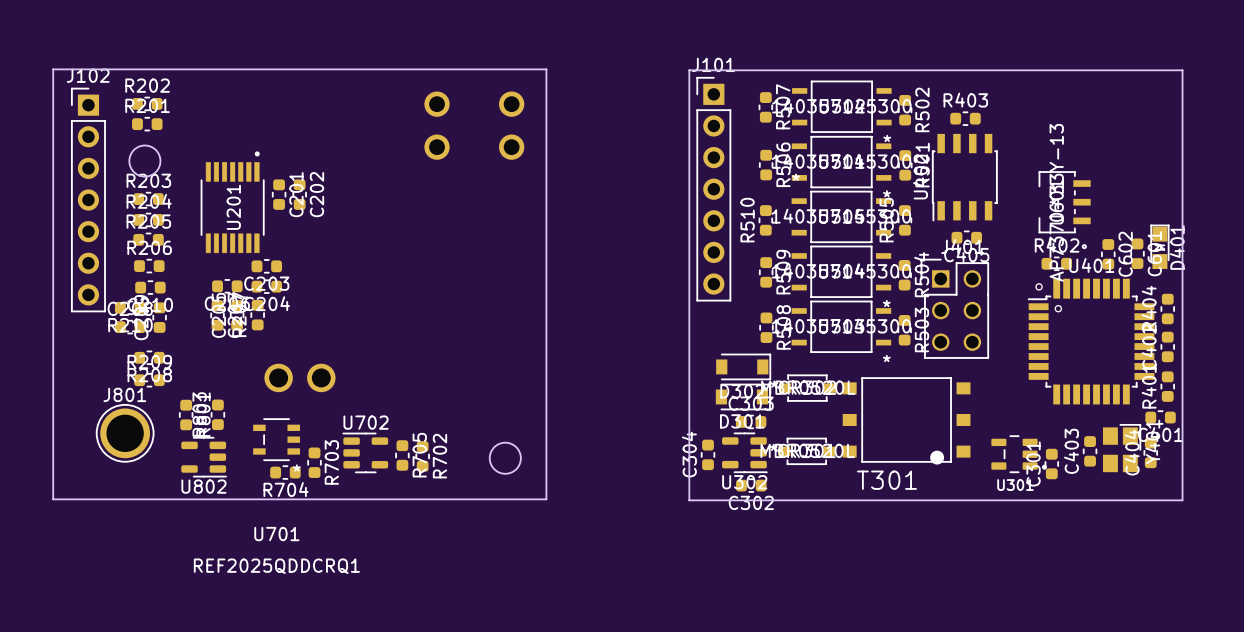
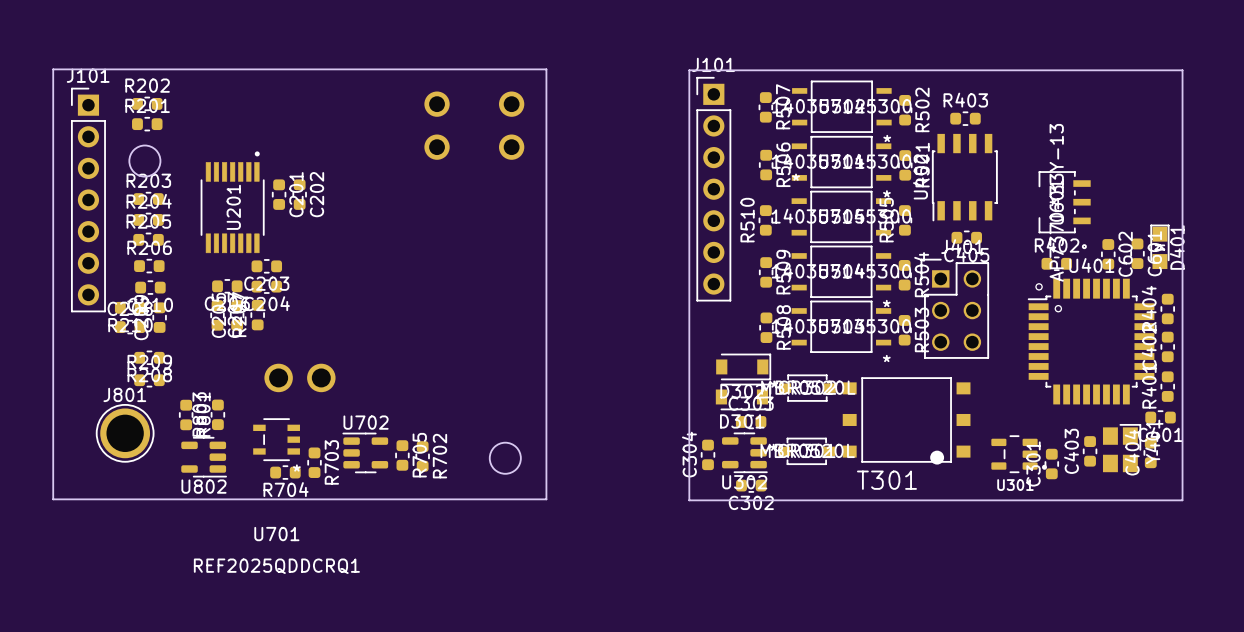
J102 name: J102 (88, 75) -> J101 (88, 75)

